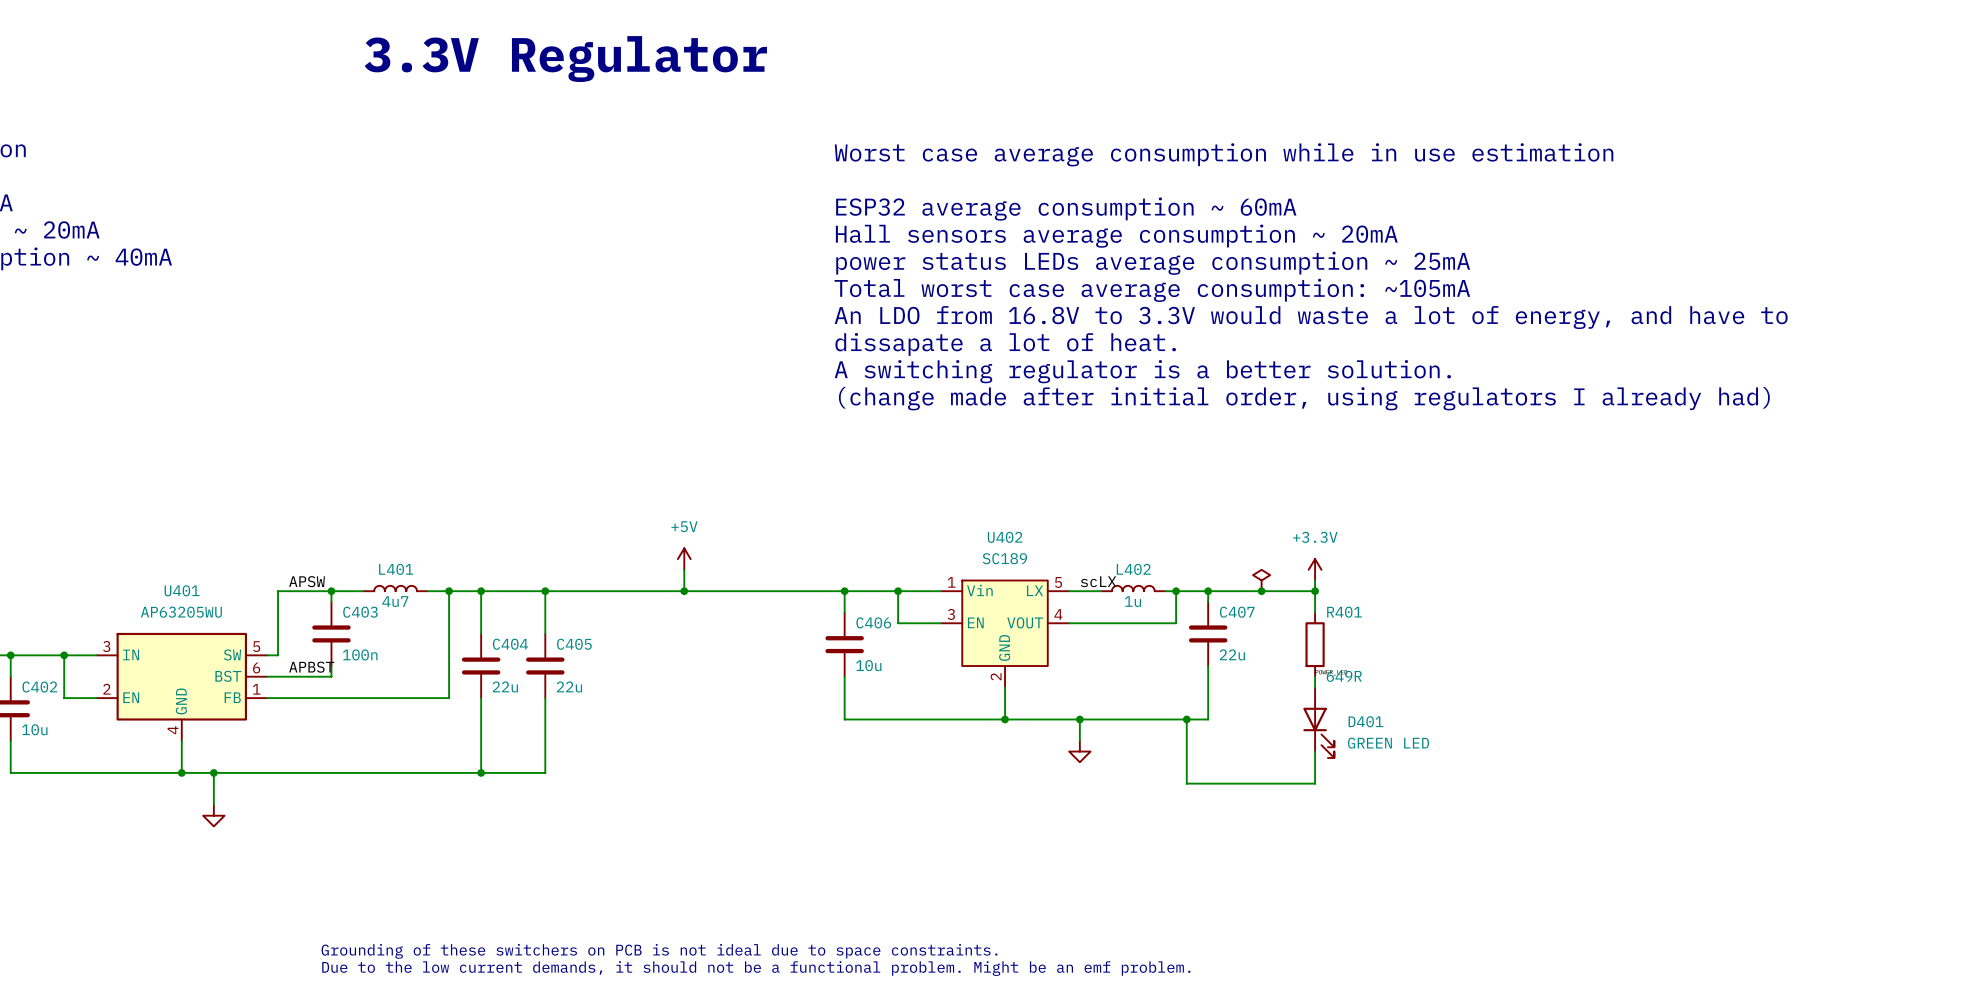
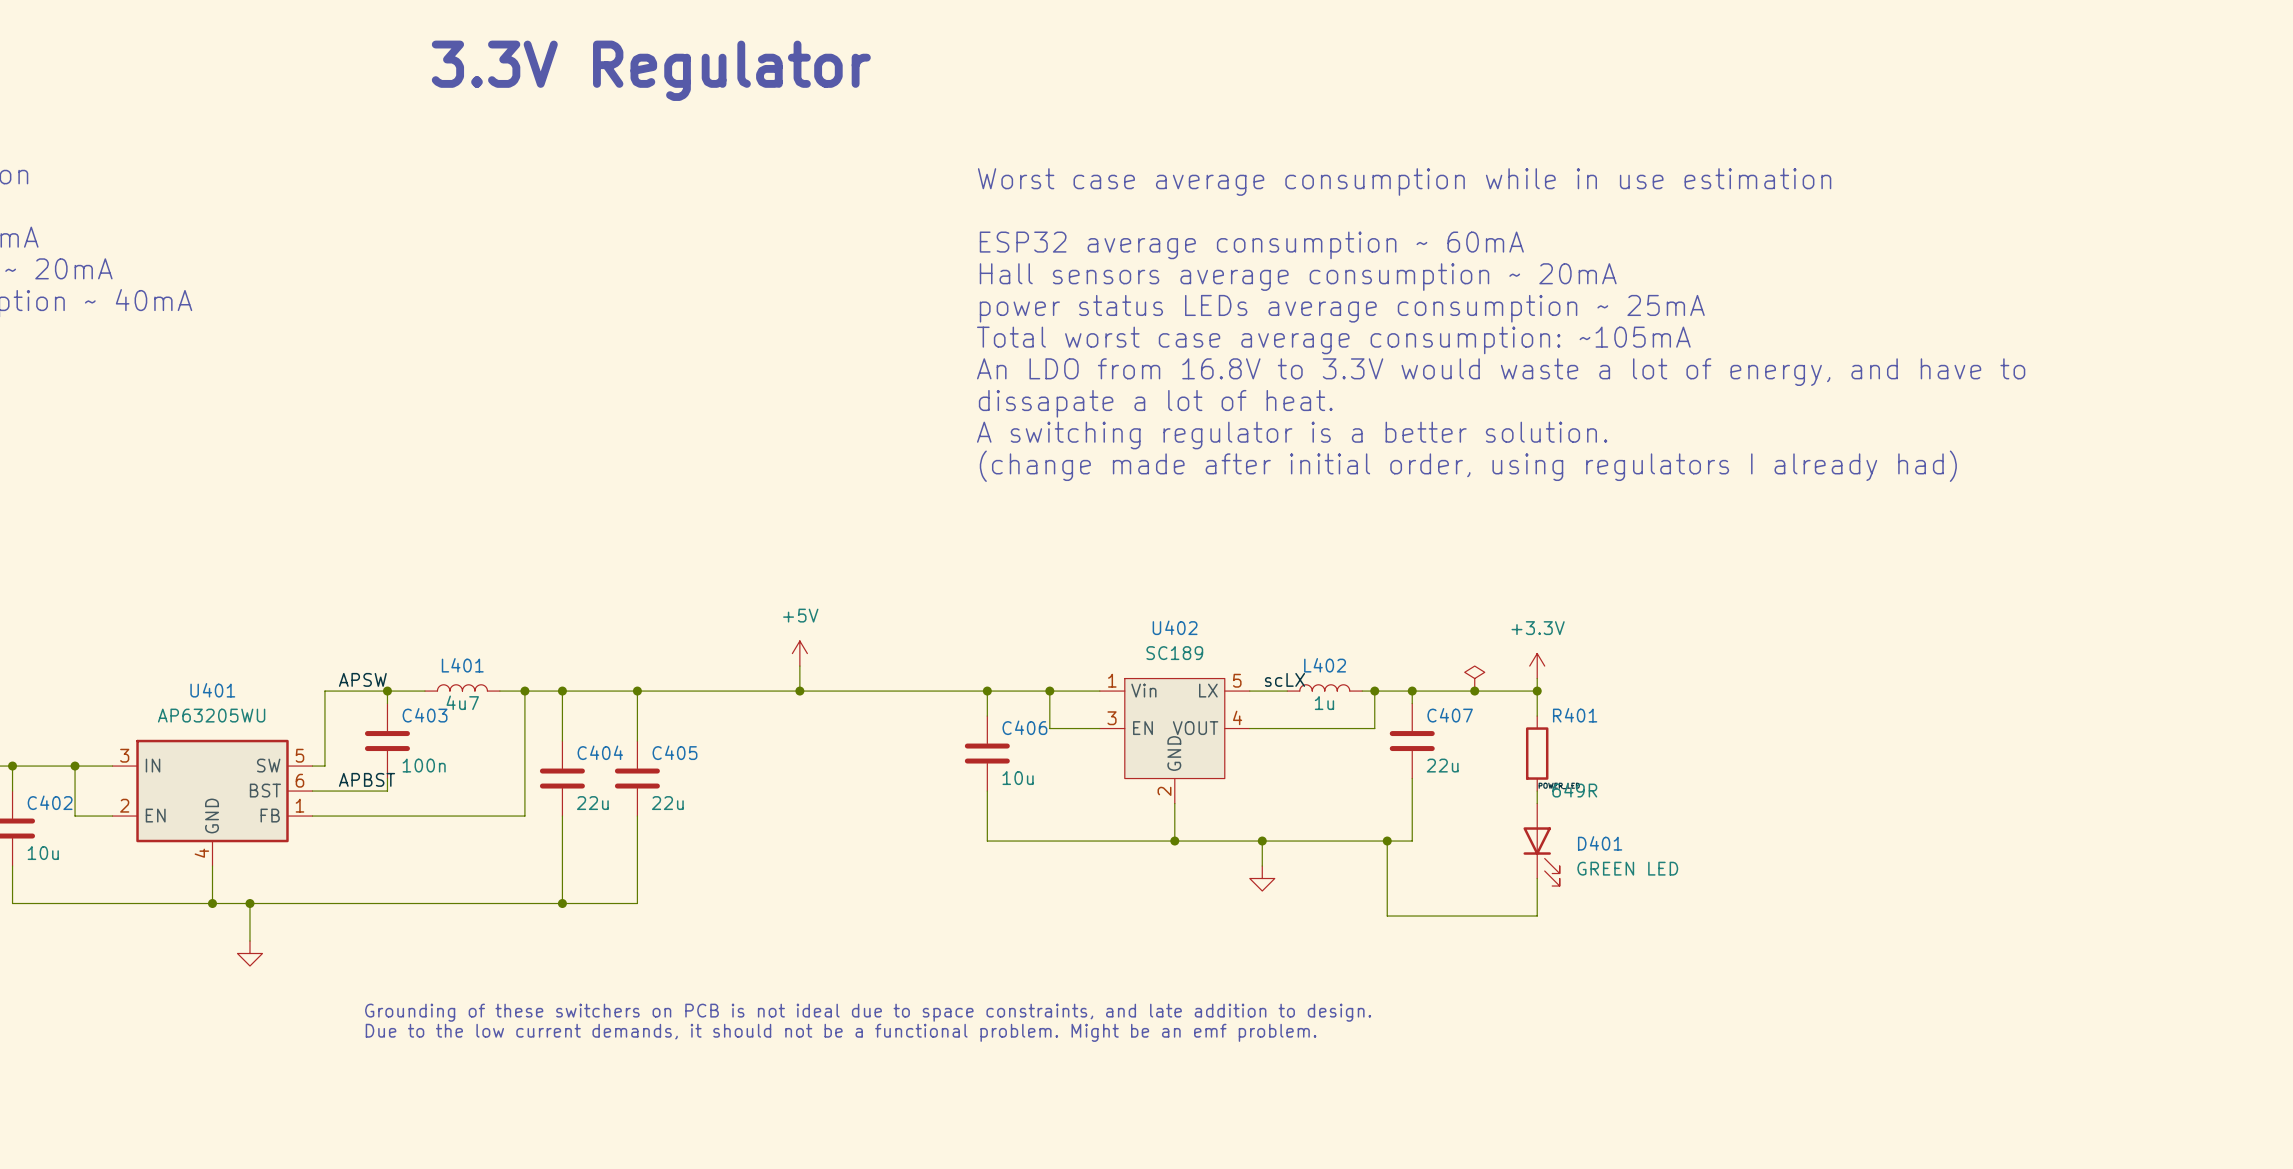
text: none -> Grounding of these switchers on PCB is not ideal due to space constraints, and late addition to design. (868, 1012)
text: Grounding of these switchers on PCB is not ideal due to space constraints. (659, 951) -> none
text position: Due to the low current demands, it should not be a functional problem. Might be an emf problem. (756, 968) -> Due to the low current demands, it should not be a functional problem. Might be an emf problem. (841, 1032)

